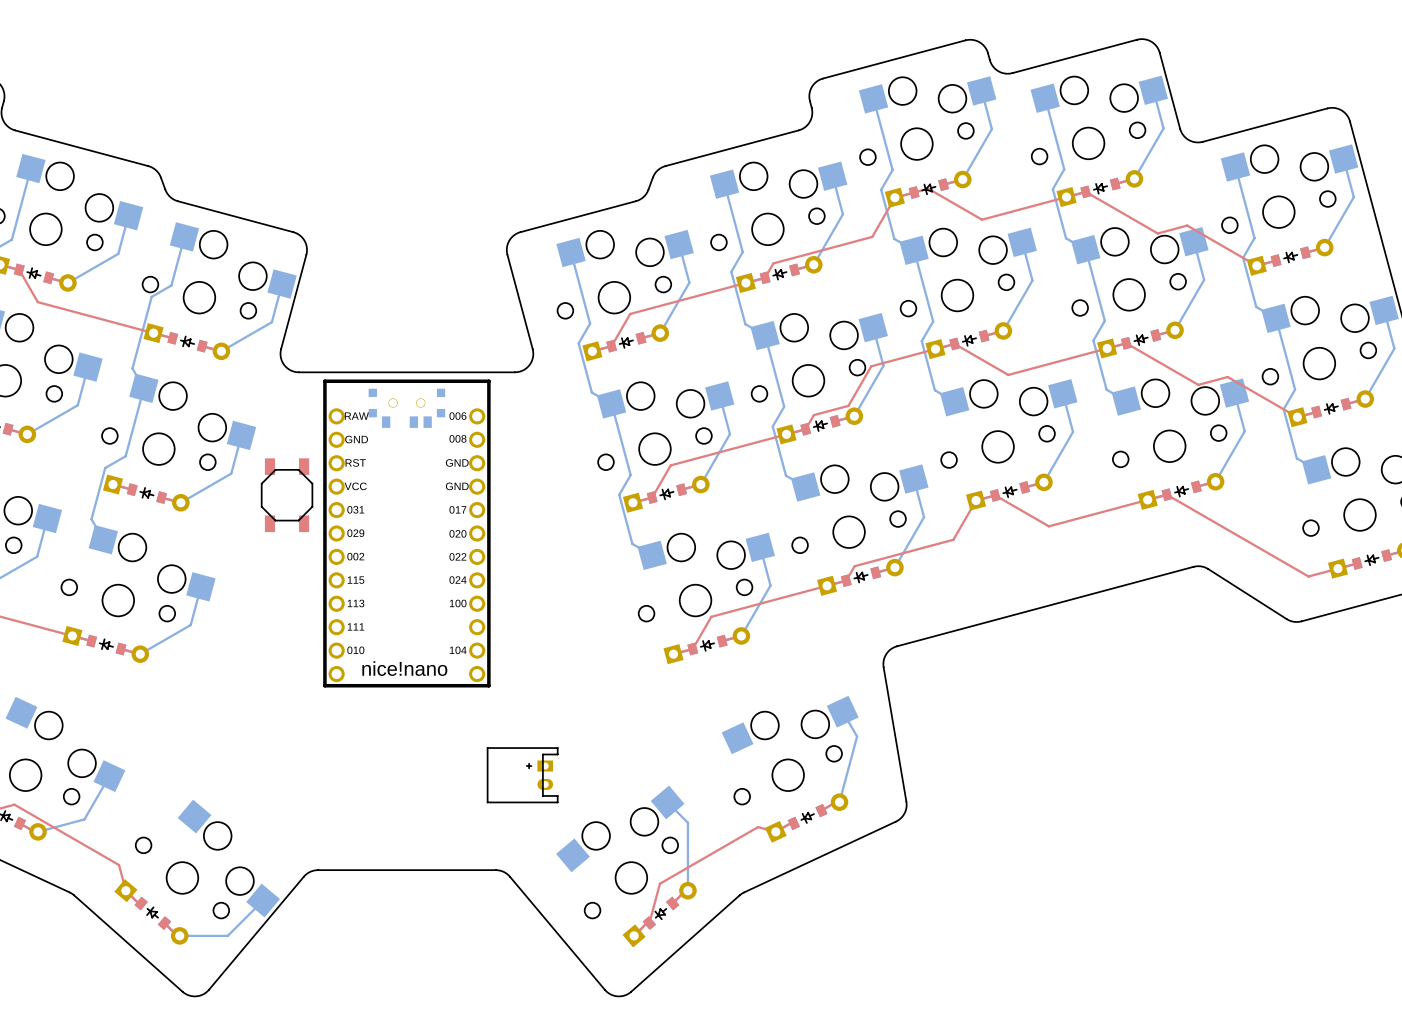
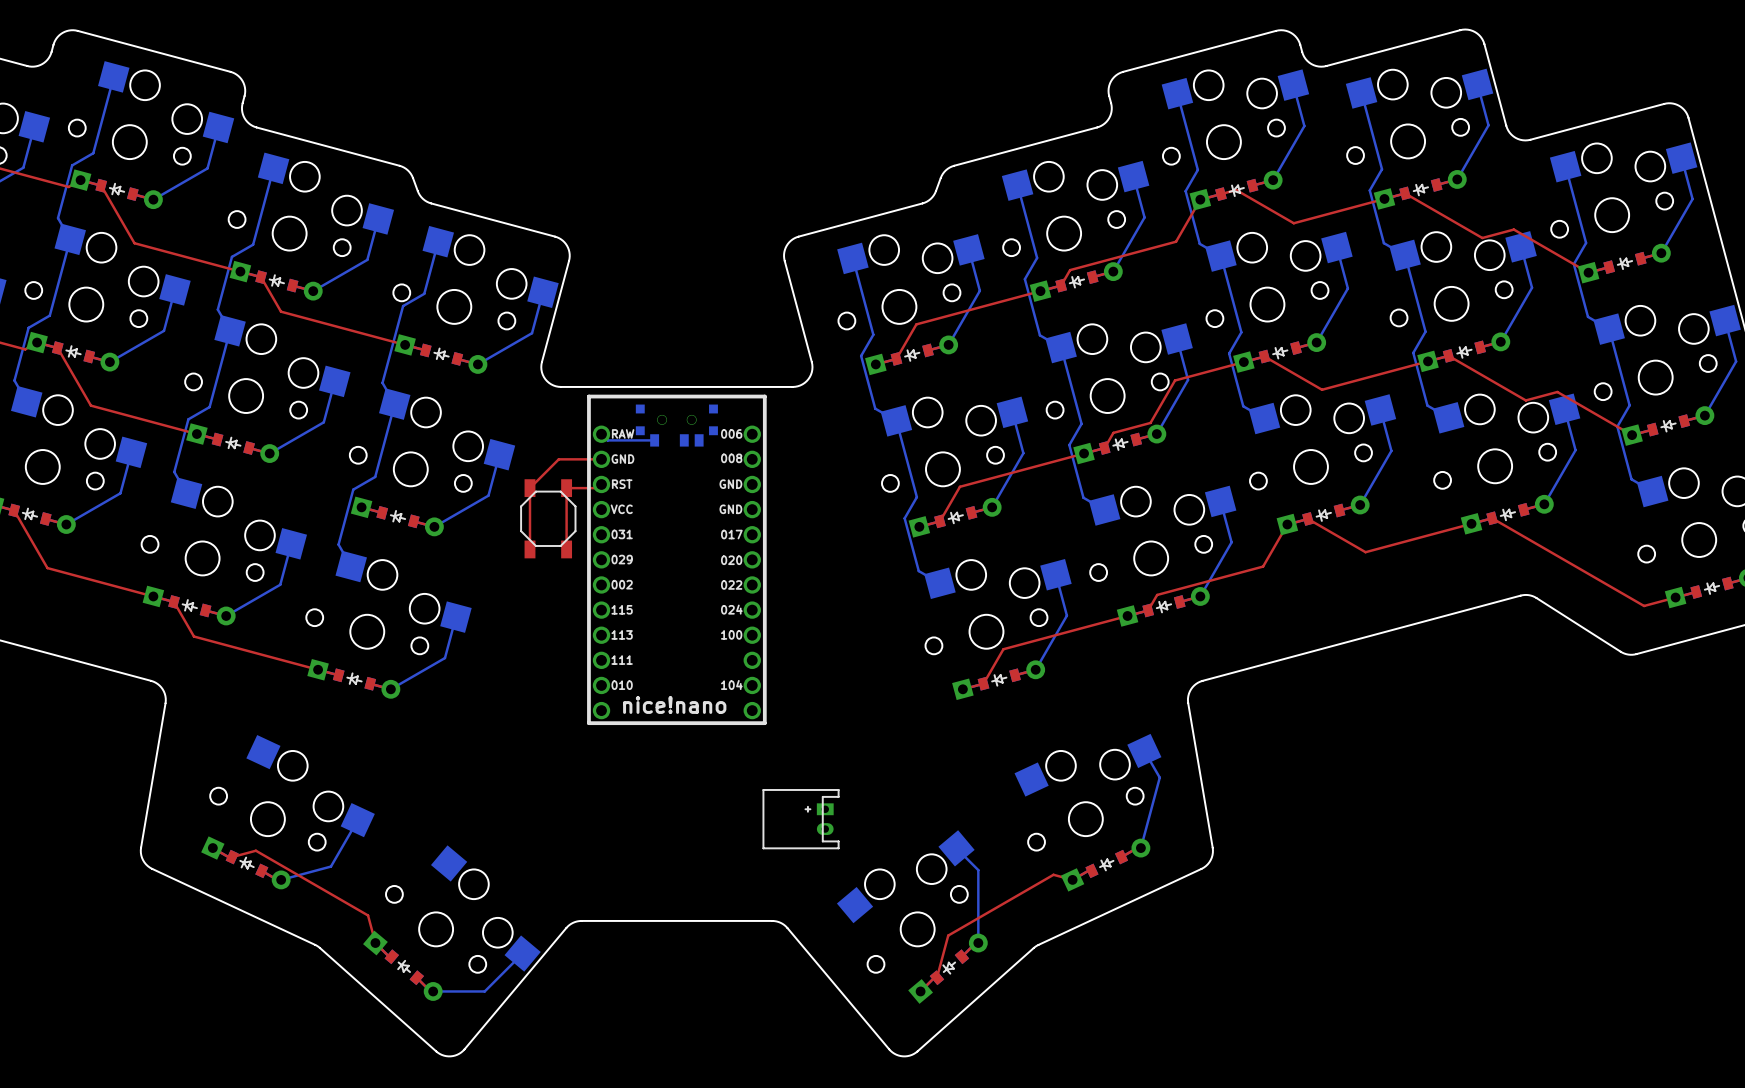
bottom track: none -> (601, 434) (607, 440) (654, 440)
top track: none -> (601, 459) (558, 459) (530, 488) (530, 549)
top track: none -> (601, 484) (597, 488) (566, 488) (566, 549)

